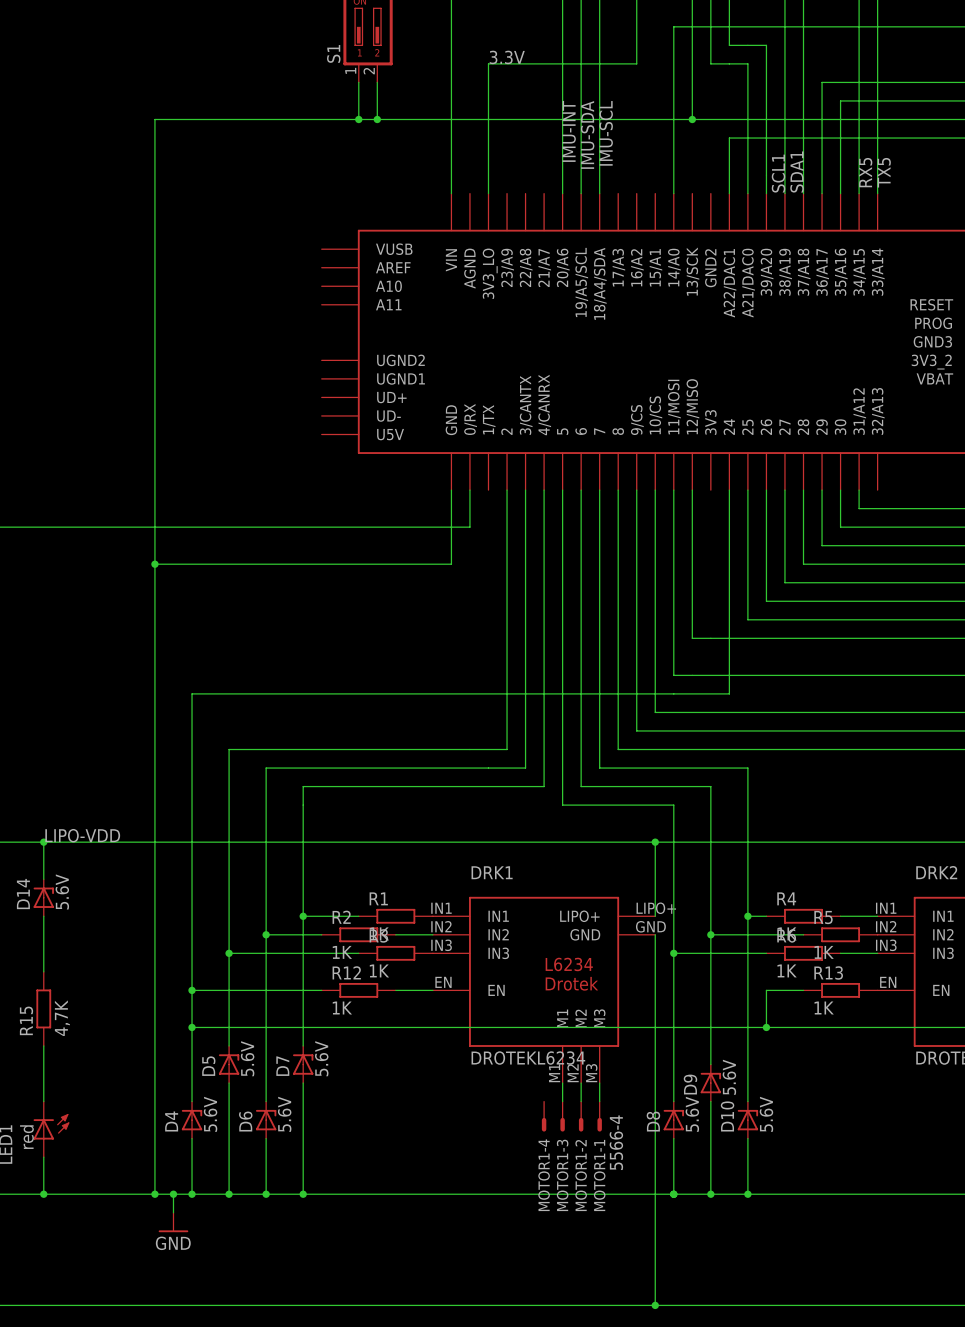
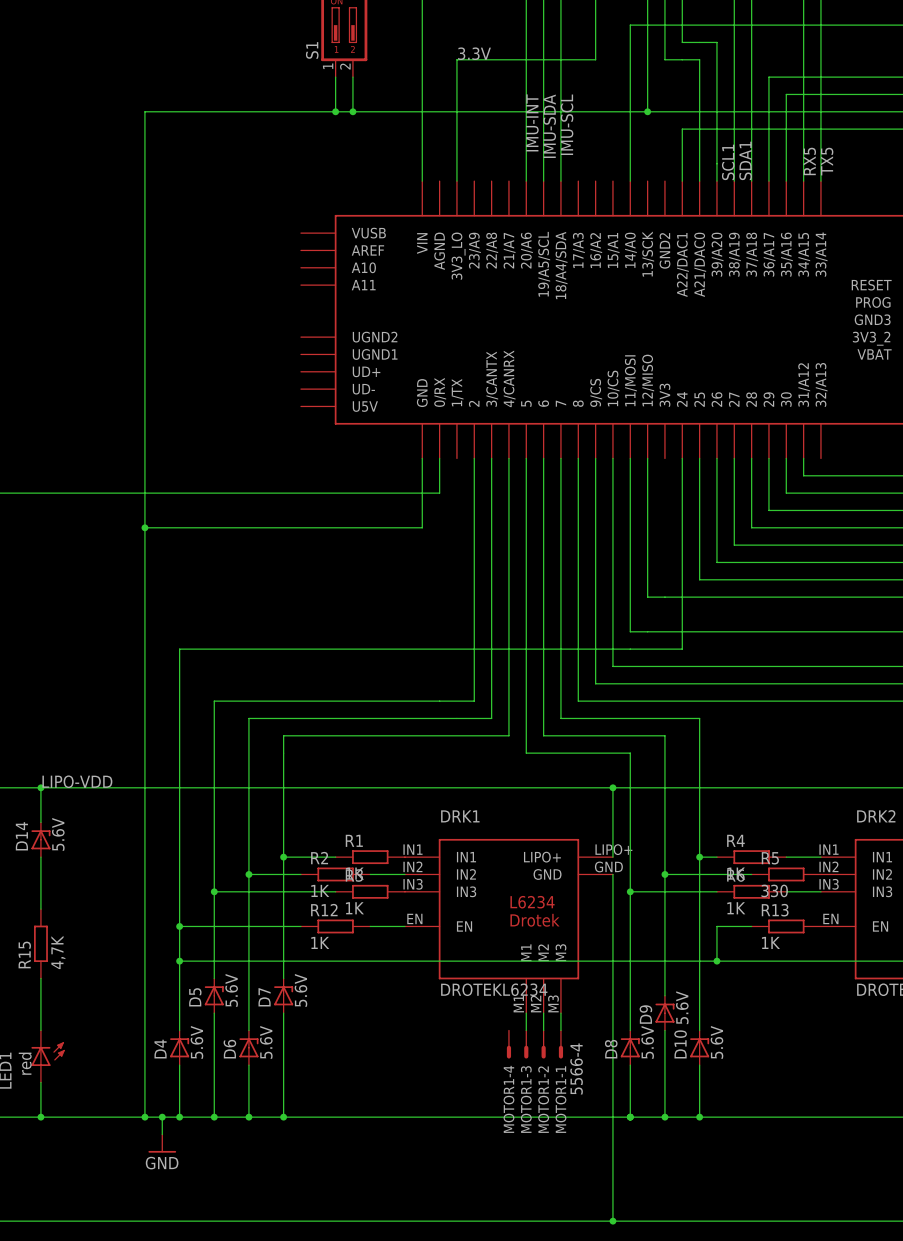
R5 value: 1K (824, 952) -> 330 (774, 890)

